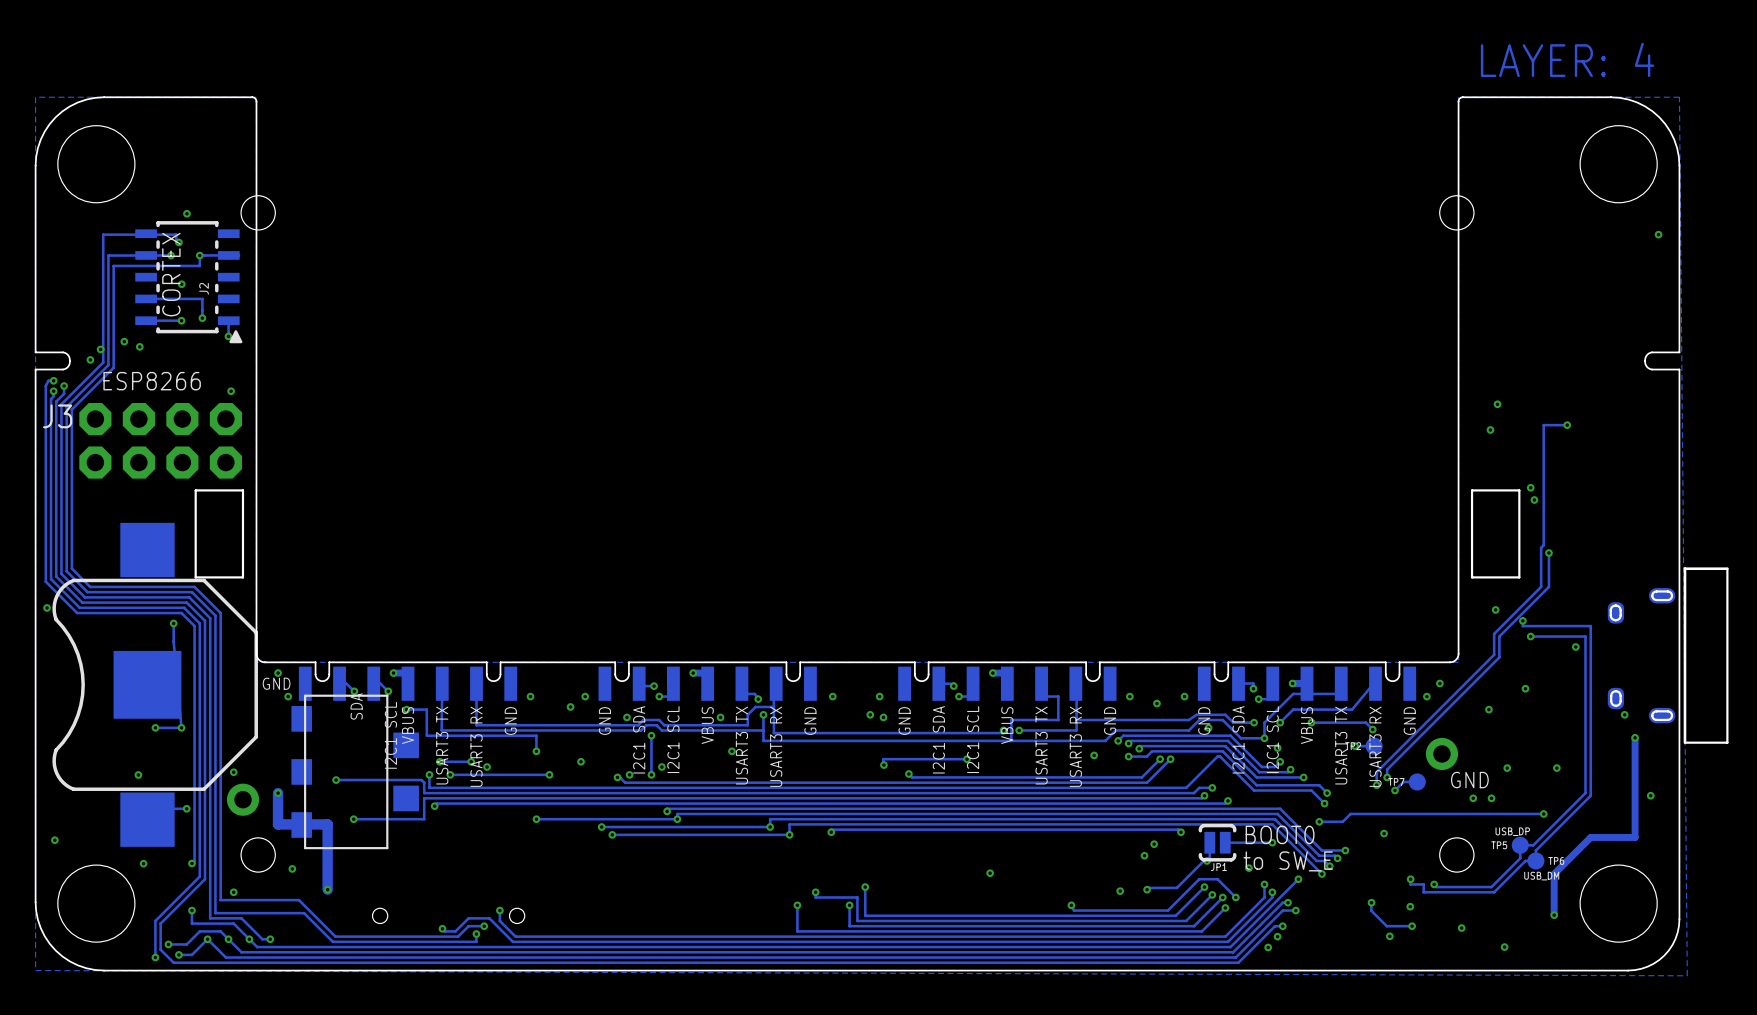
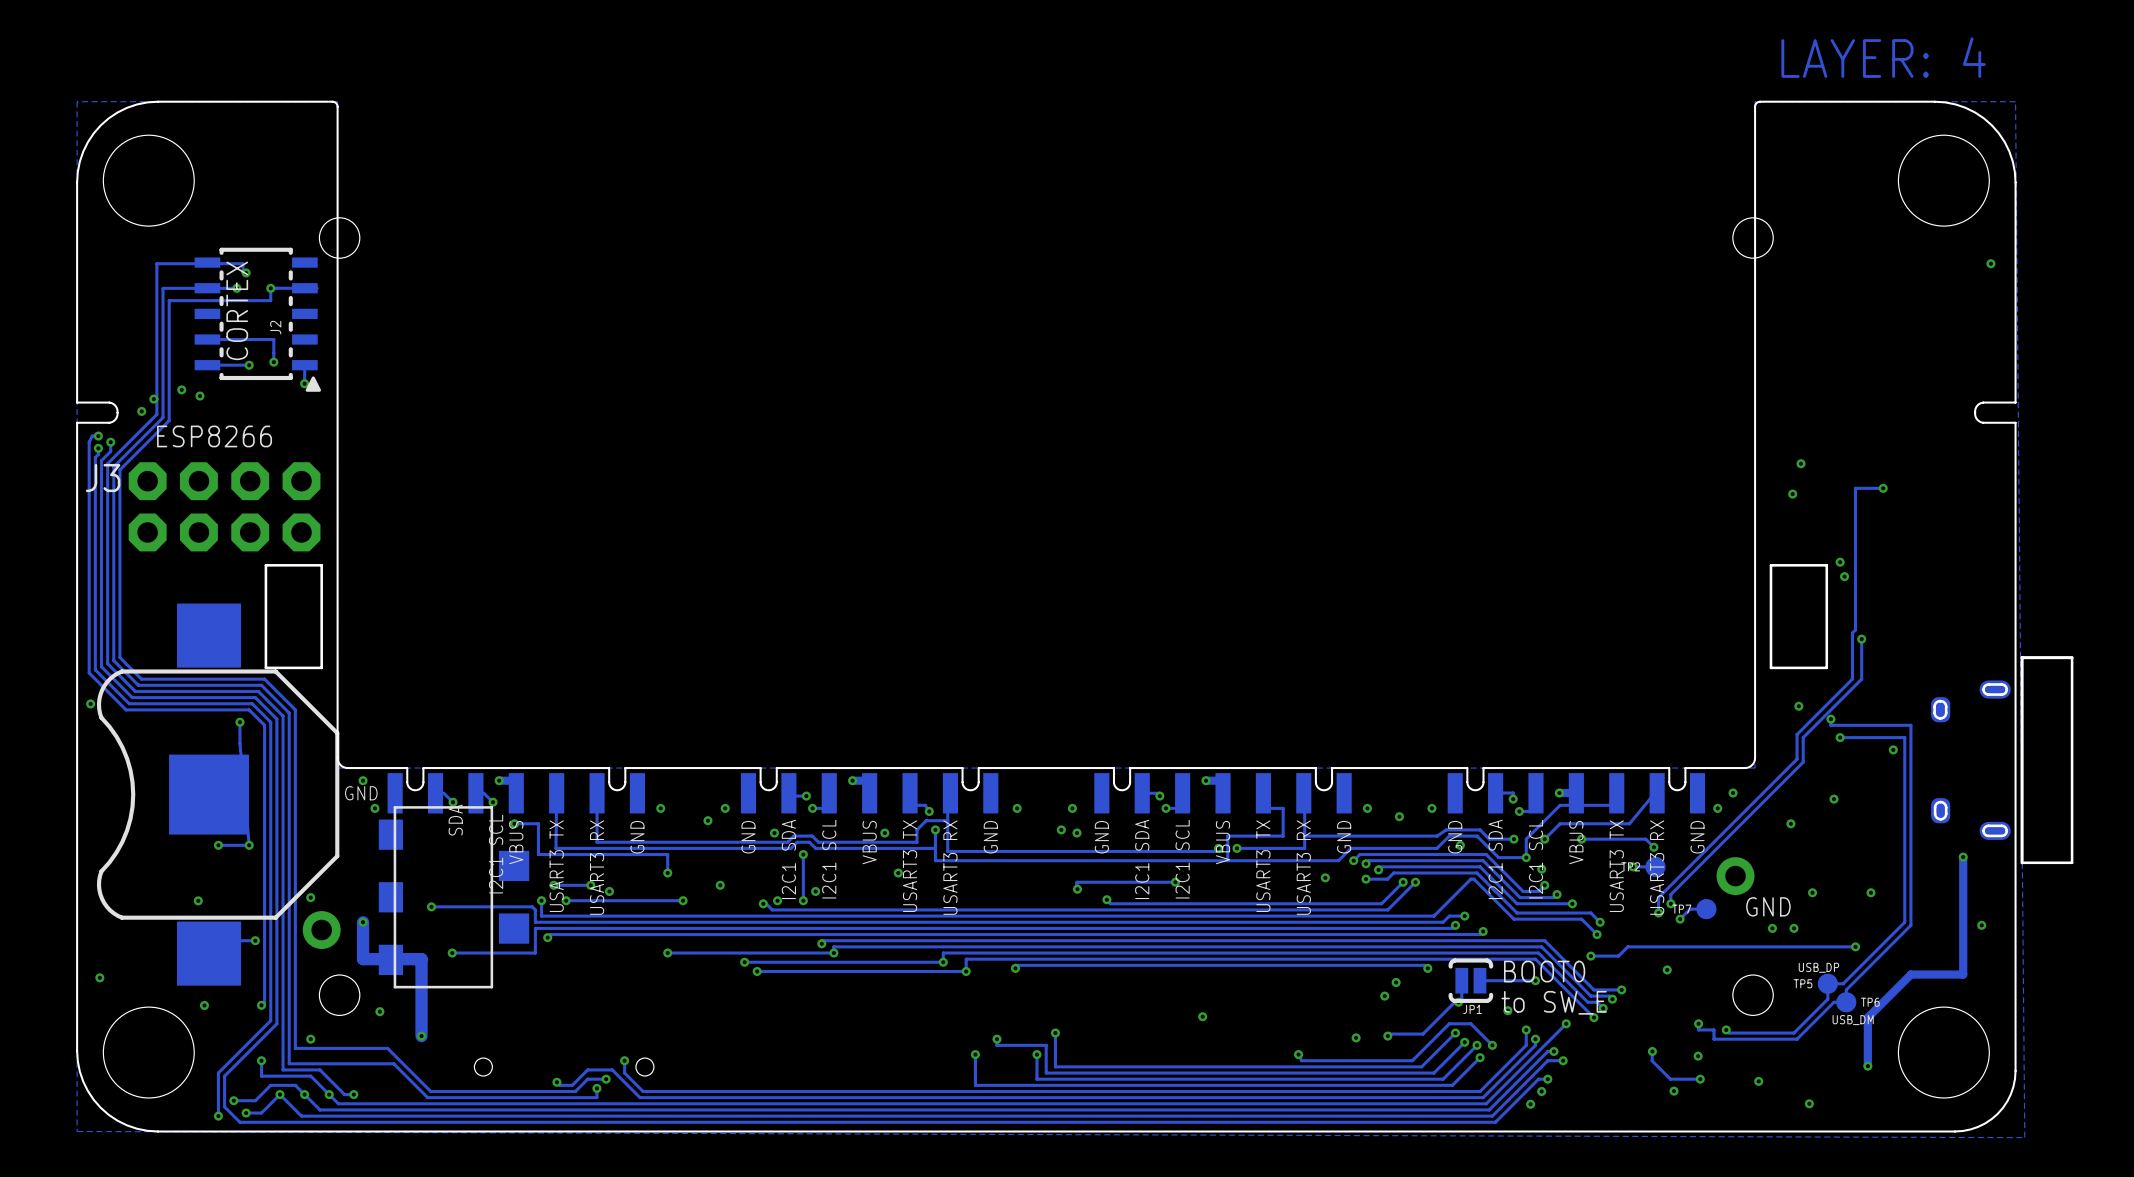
via: (186, 213) -> none
via: (181, 284) -> none
via: (231, 391) -> none
via: (1624, 714) -> none

